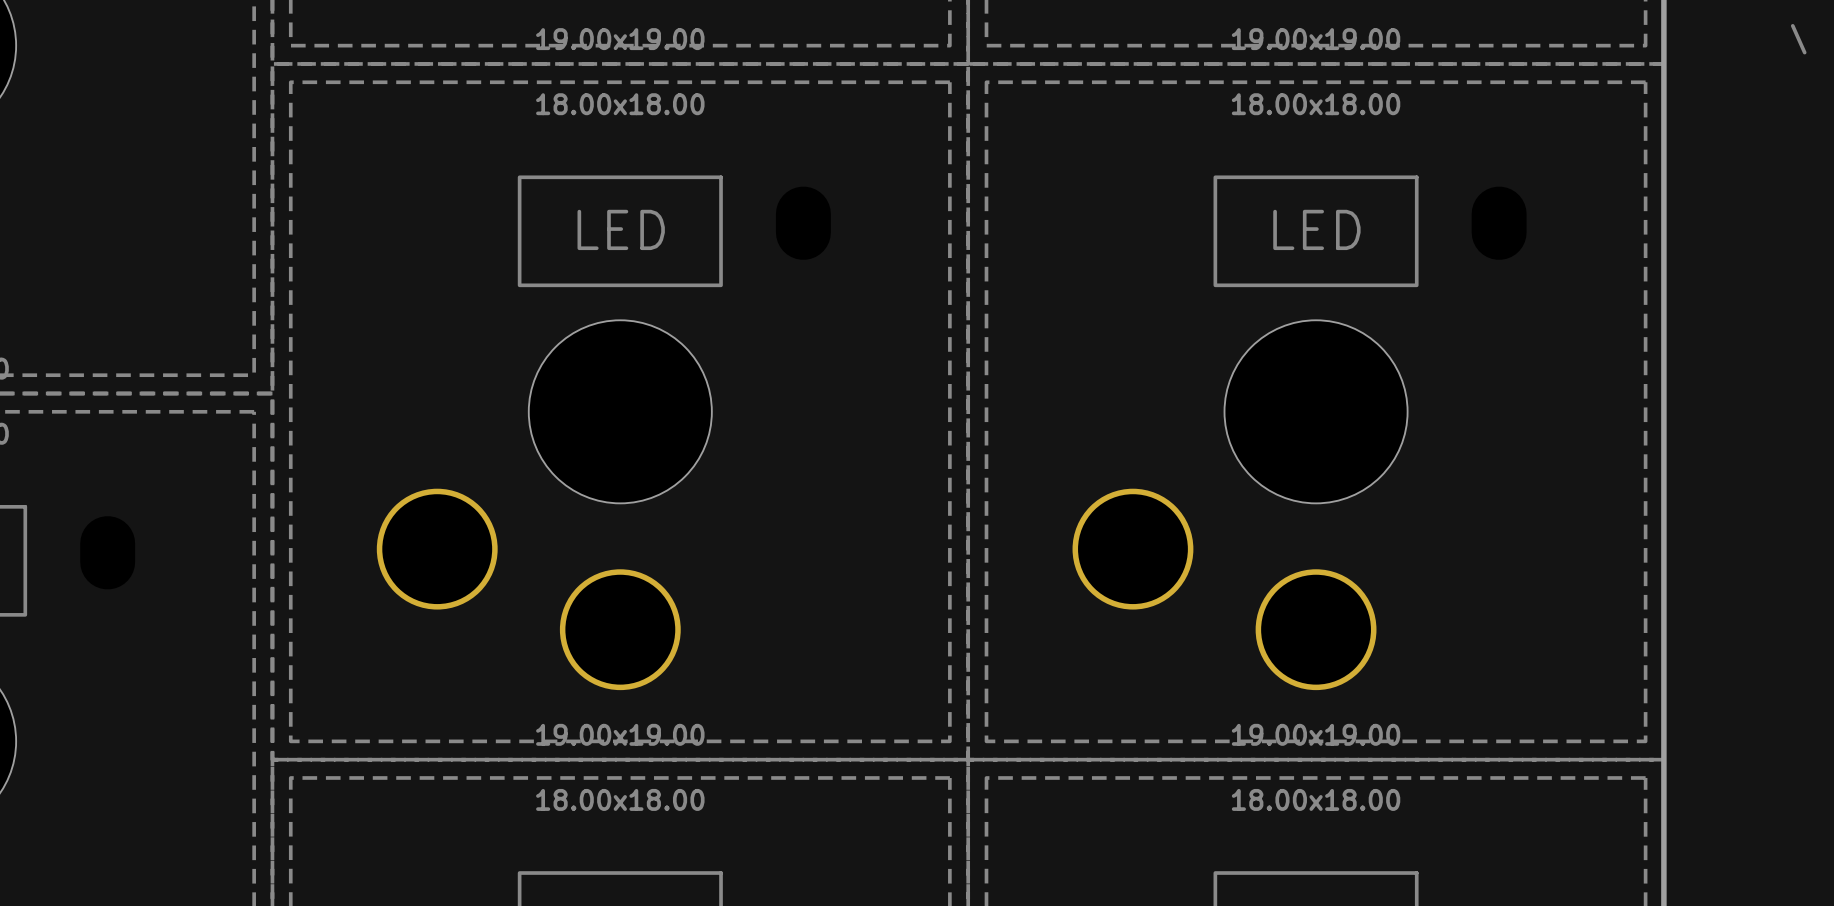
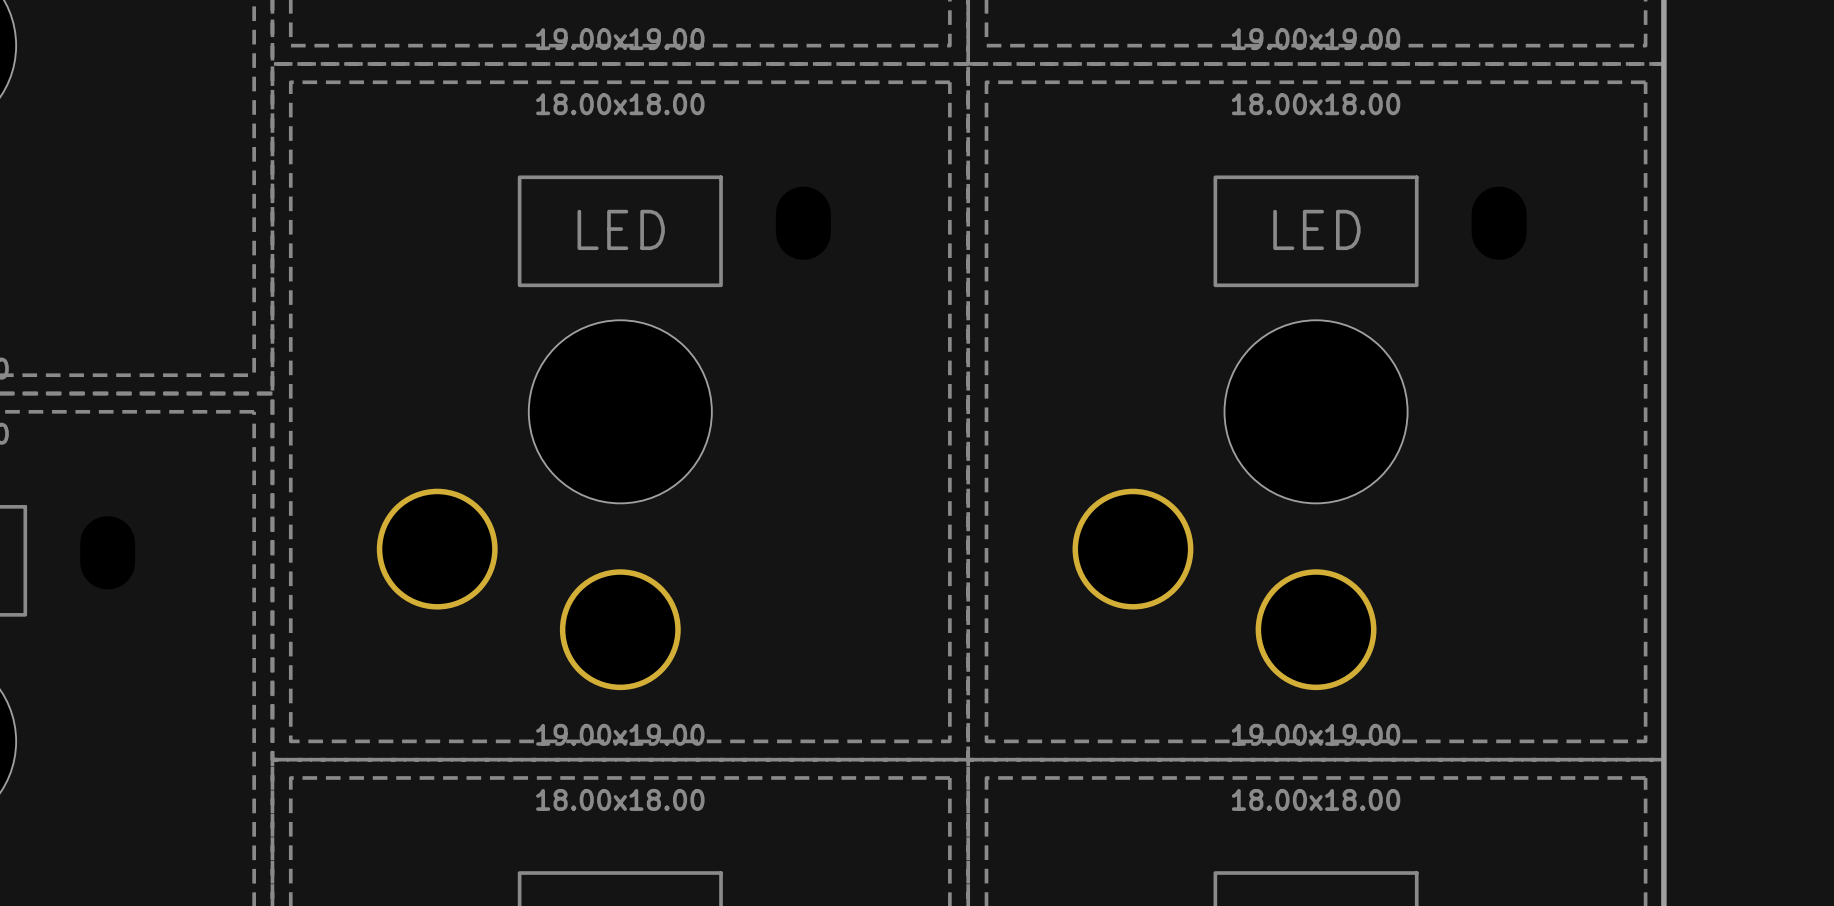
line: (1792, 25) (1804, 52) -> none

